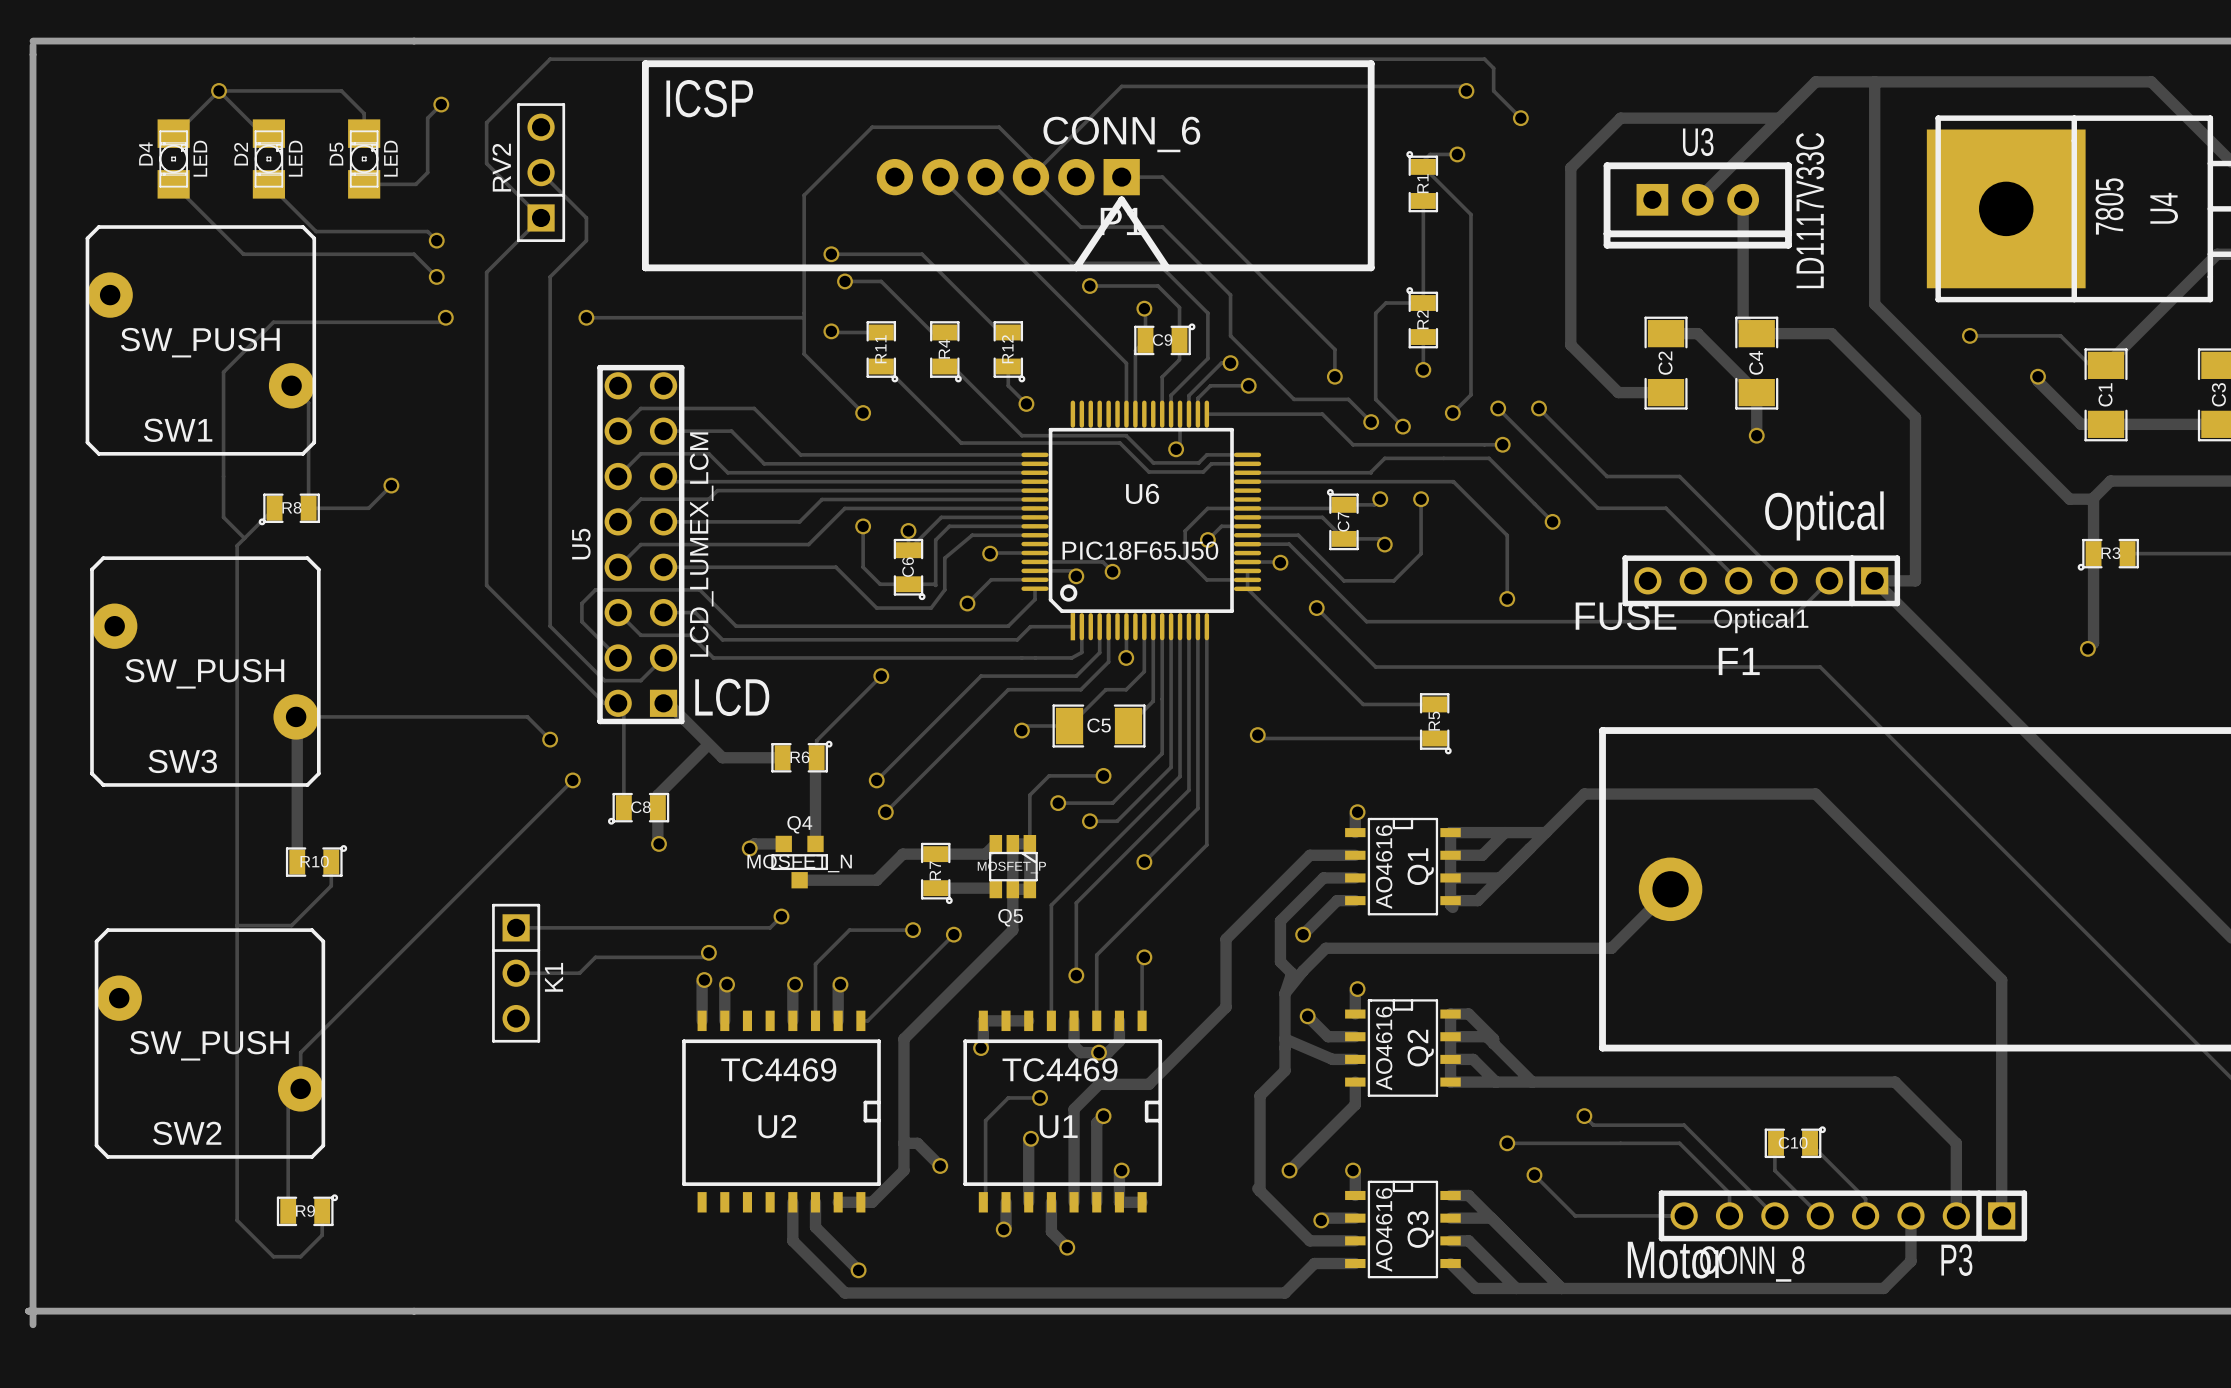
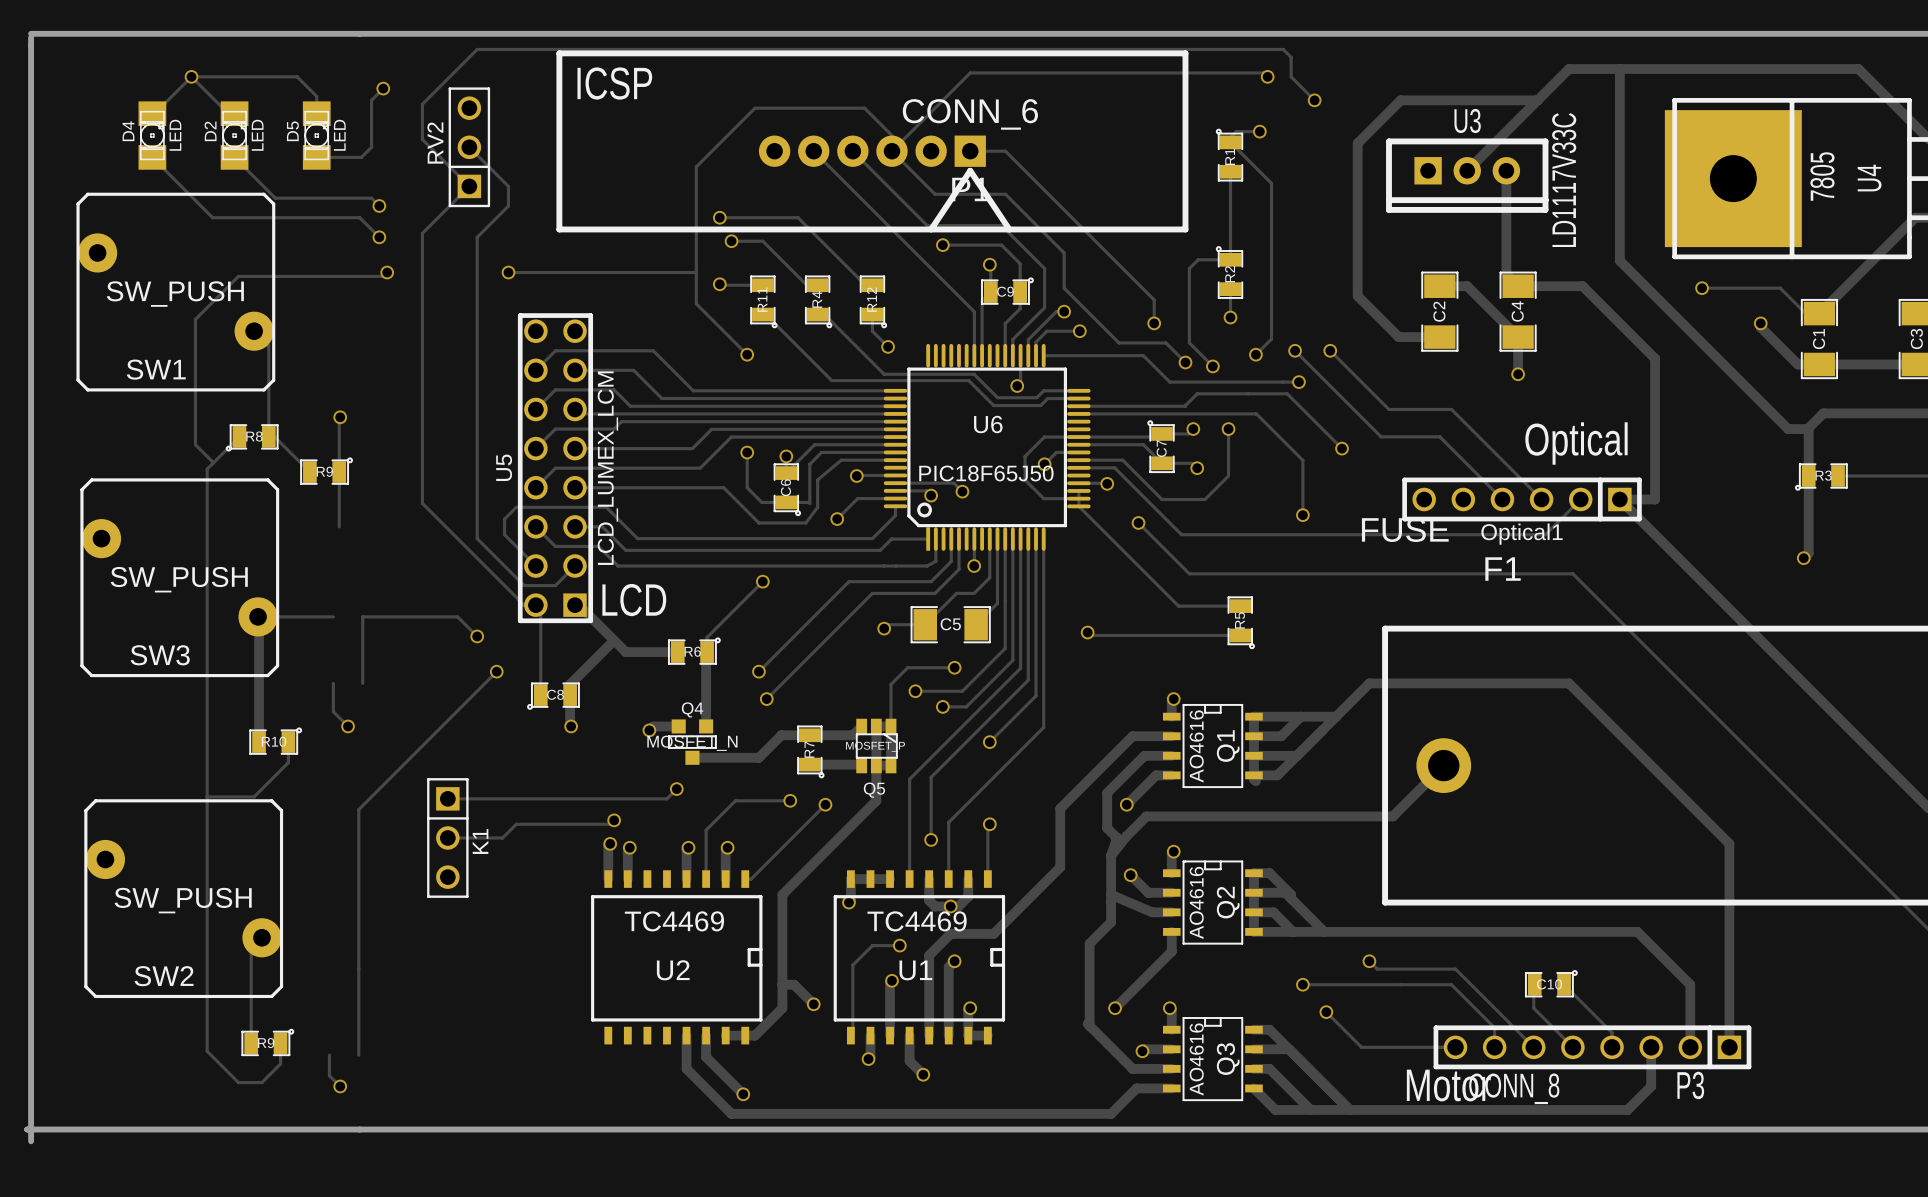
track: (390, 486) (368, 508) (315, 508) -> (309, 472) (274, 436)
track: none -> (339, 418) (339, 526)
R9: none -> (326, 471)
track: (383, 716) (417, 716) -> (362, 683) (362, 616)
track: none -> (333, 683) (333, 711) (348, 726)
via: none -> (348, 726)
track: (412, 940) (300, 1052) (300, 1088) -> (358, 809) (358, 1055)
track: none -> (329, 1055) (329, 1075) (340, 1086)
via: none -> (340, 1086)

